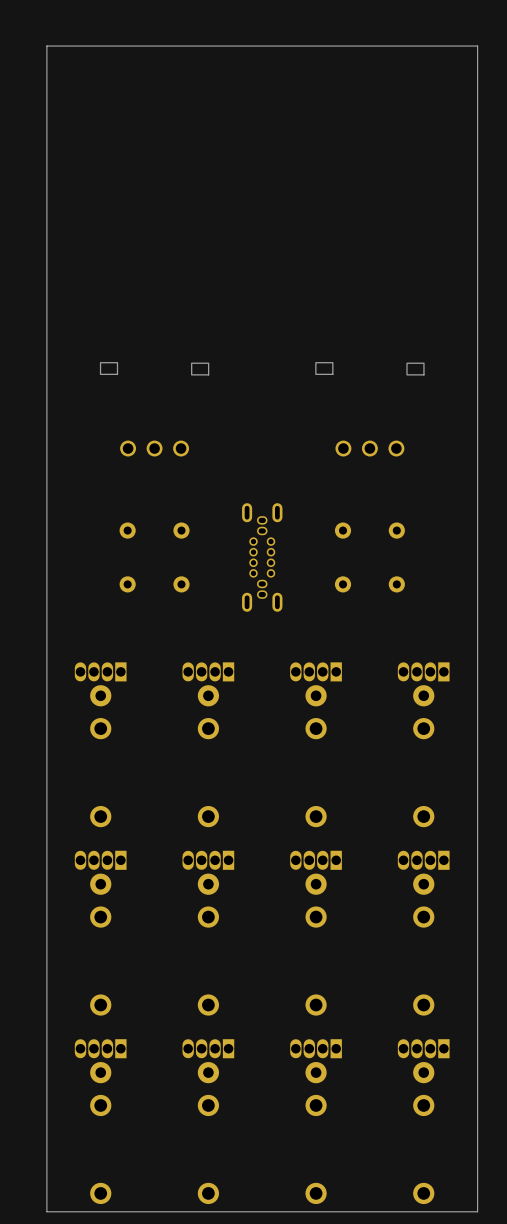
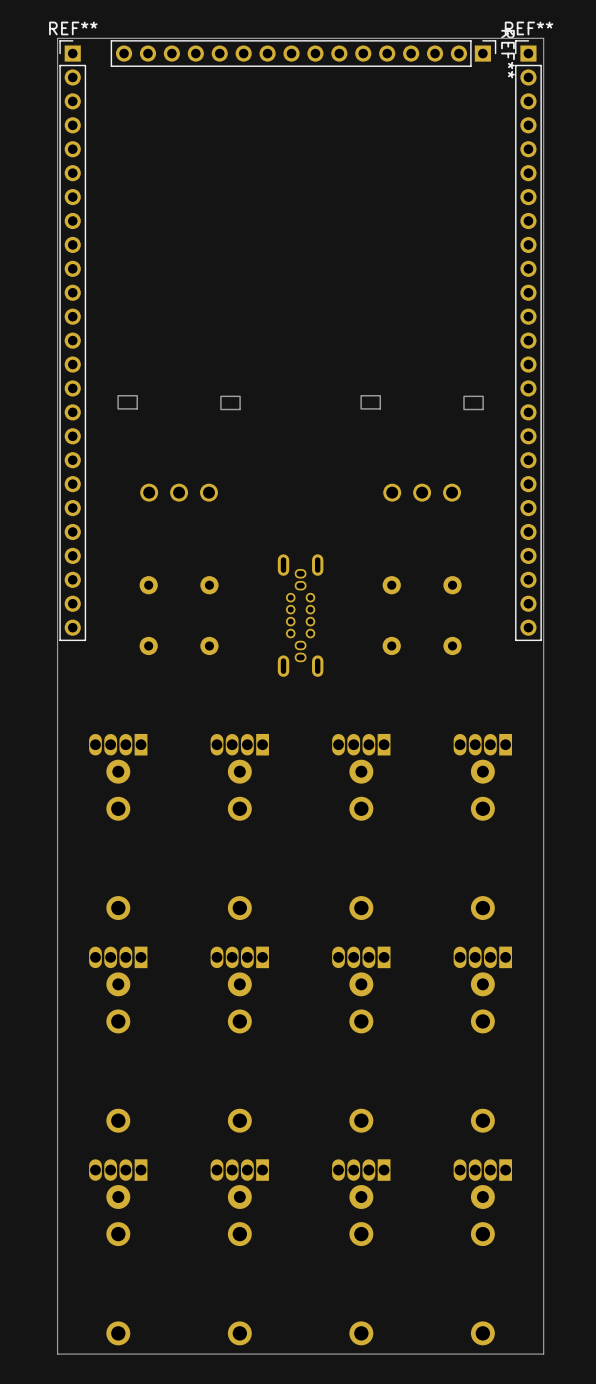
REF**: none -> (303, 53)
REF**: none -> (72, 340)
REF**: none -> (528, 340)

